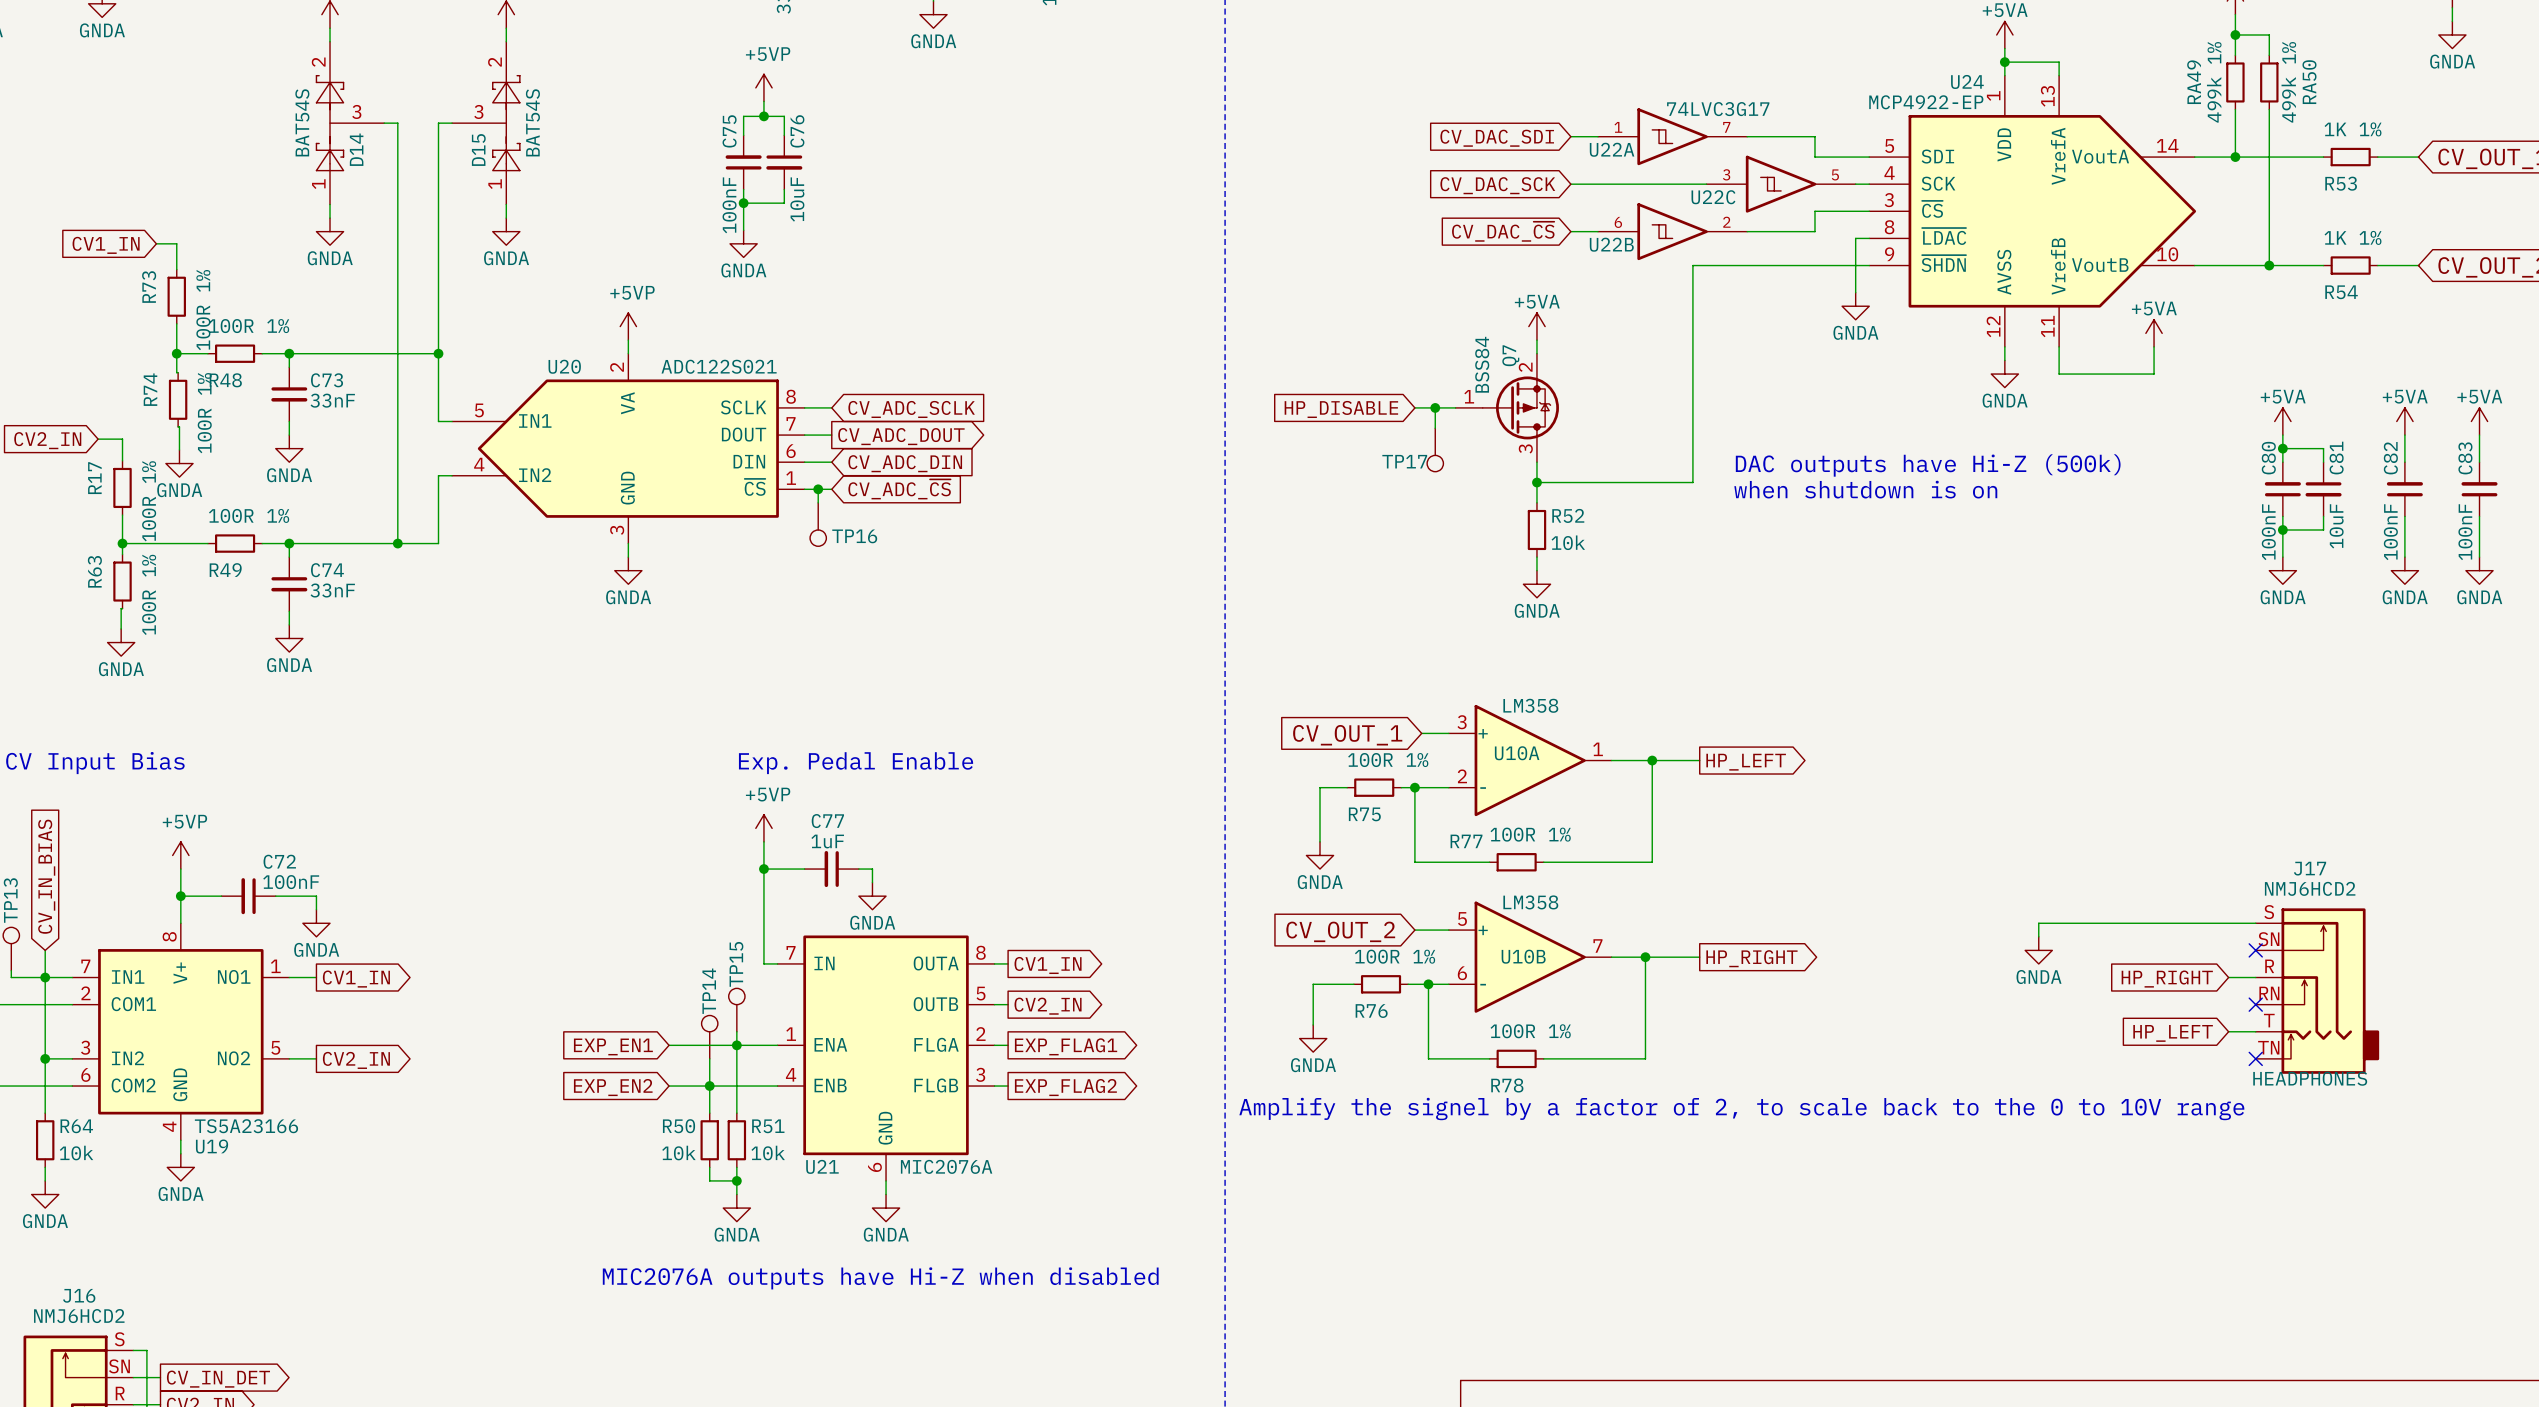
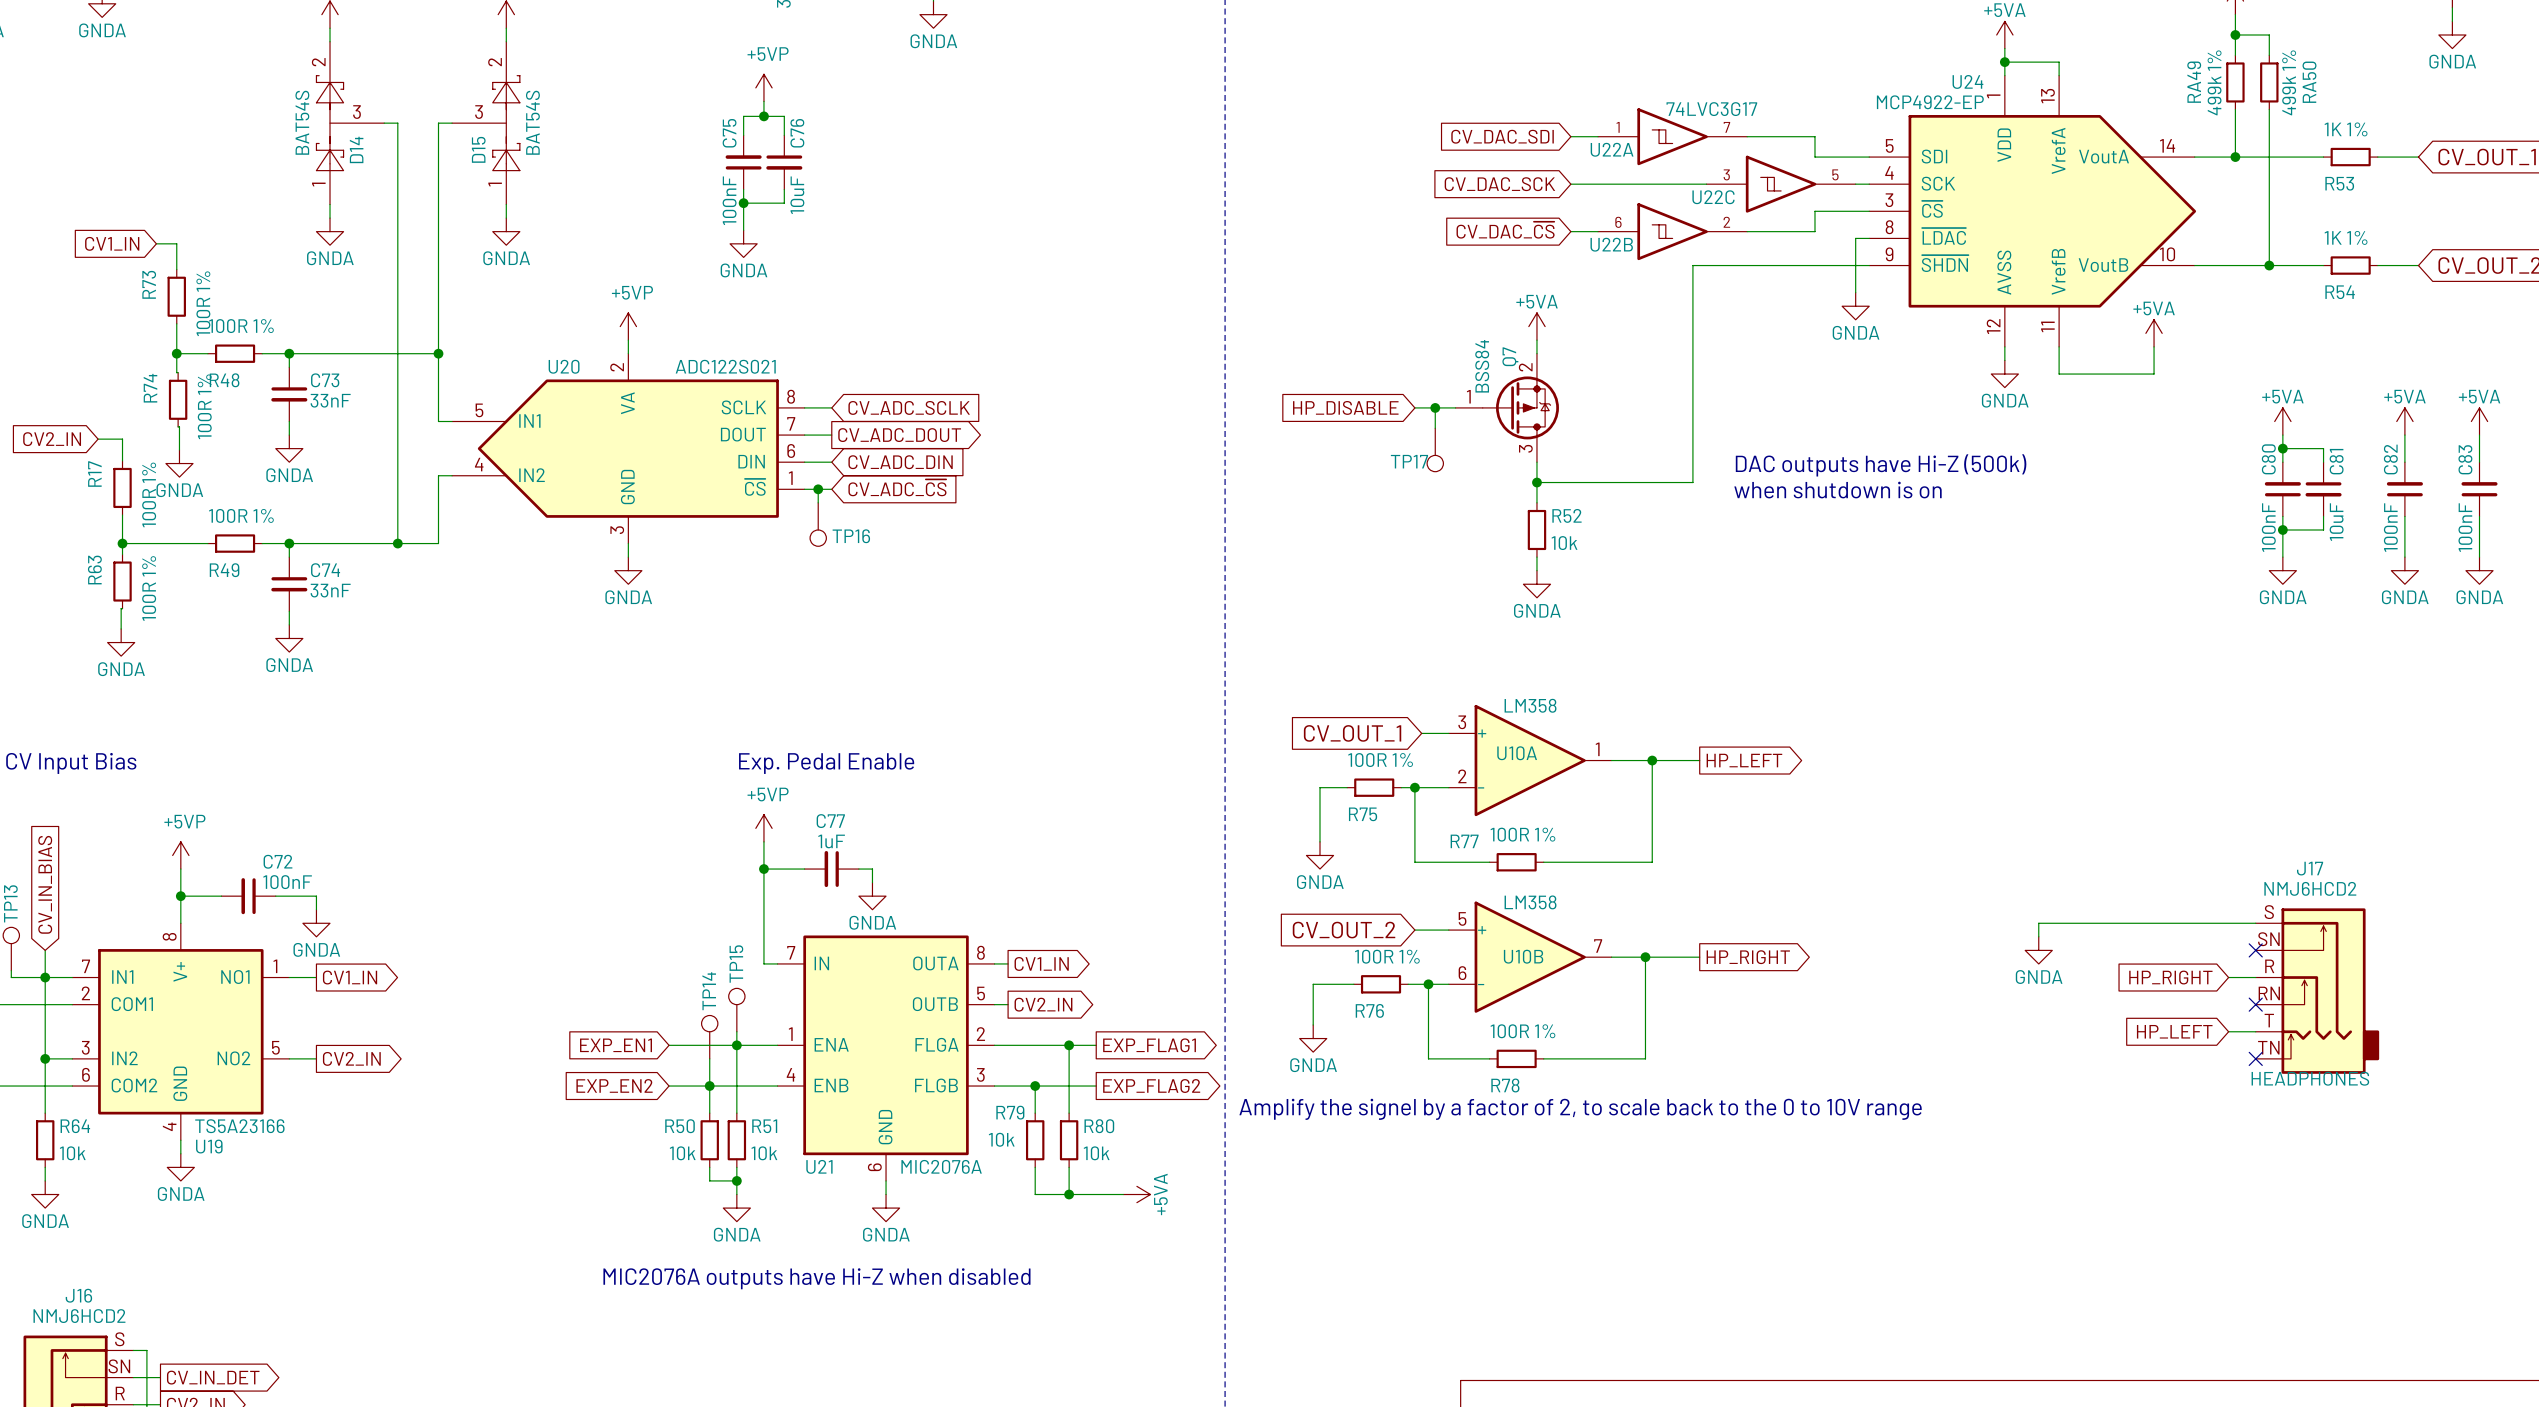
wire: none -> (1008, 1045) (1096, 1045)
wire: none -> (1069, 1045) (1069, 1113)
junction: none -> (1069, 1045)
global label position: EXP_FLAG1 (1066, 1046) -> EXP_FLAG1 (1149, 1045)
wire: none -> (1008, 1086) (1096, 1086)
wire: none -> (1035, 1086) (1035, 1113)
junction: none -> (1035, 1086)
global label position: EXP_FLAG2 (1065, 1087) -> EXP_FLAG2 (1151, 1086)
R79: none -> 10k (1035, 1140)
R80: none -> 10k (1069, 1140)
wire: none -> (1035, 1167) (1035, 1194) (1123, 1194)
wire: none -> (1069, 1167) (1069, 1194)
junction: none -> (1069, 1194)
power symbol: none -> +5VA (1136, 1194)

